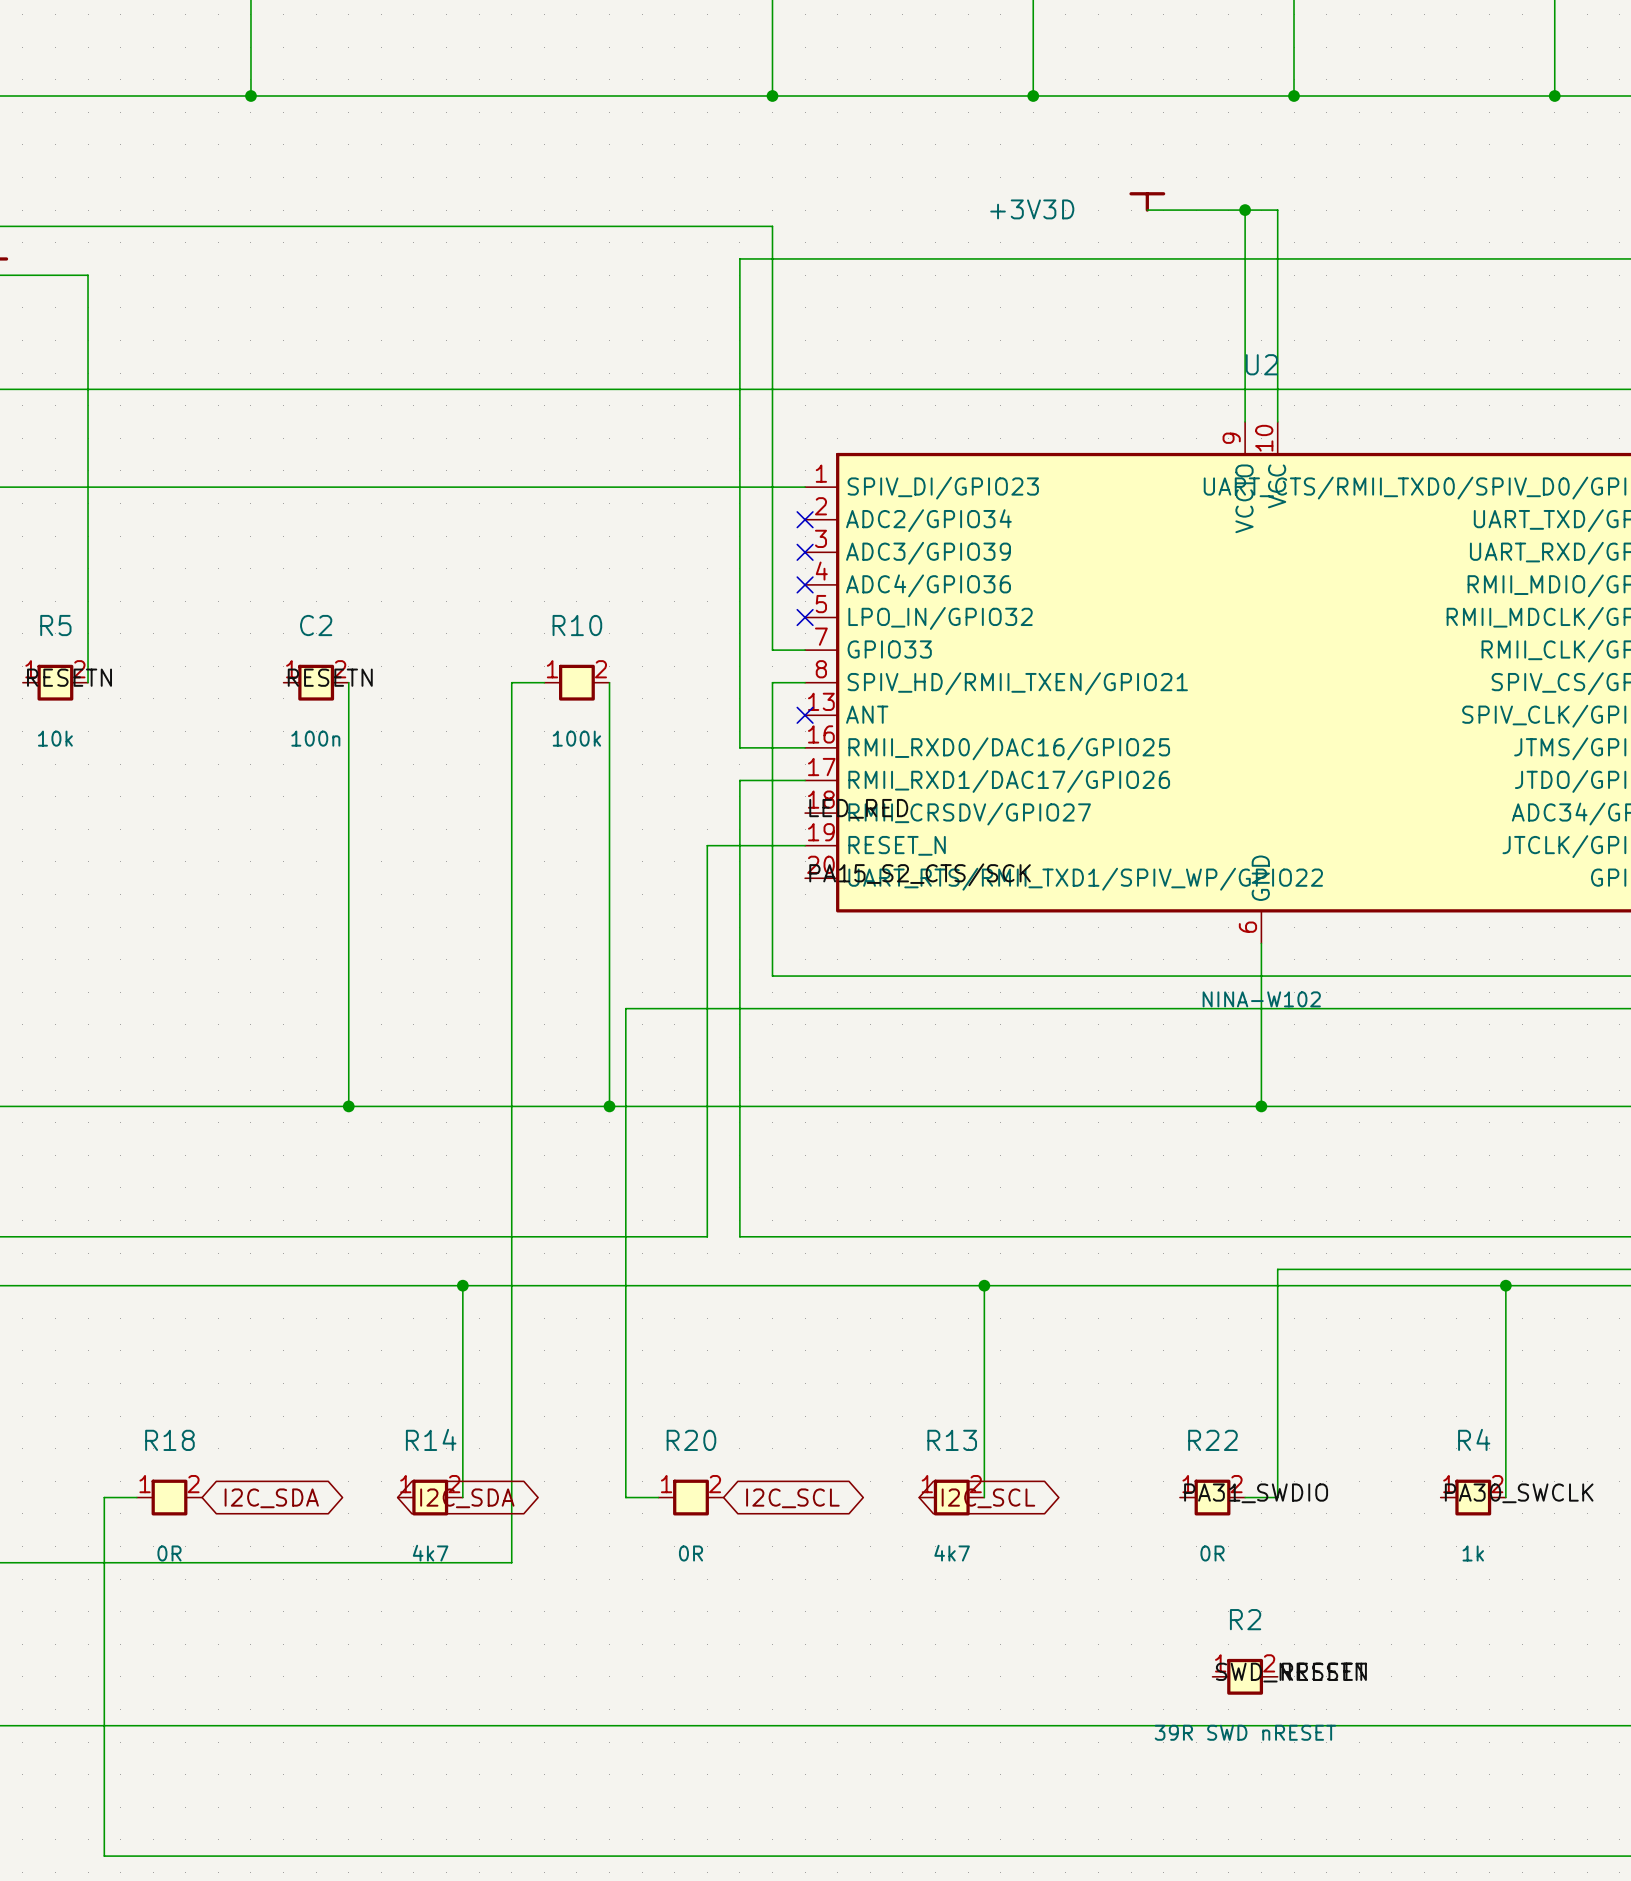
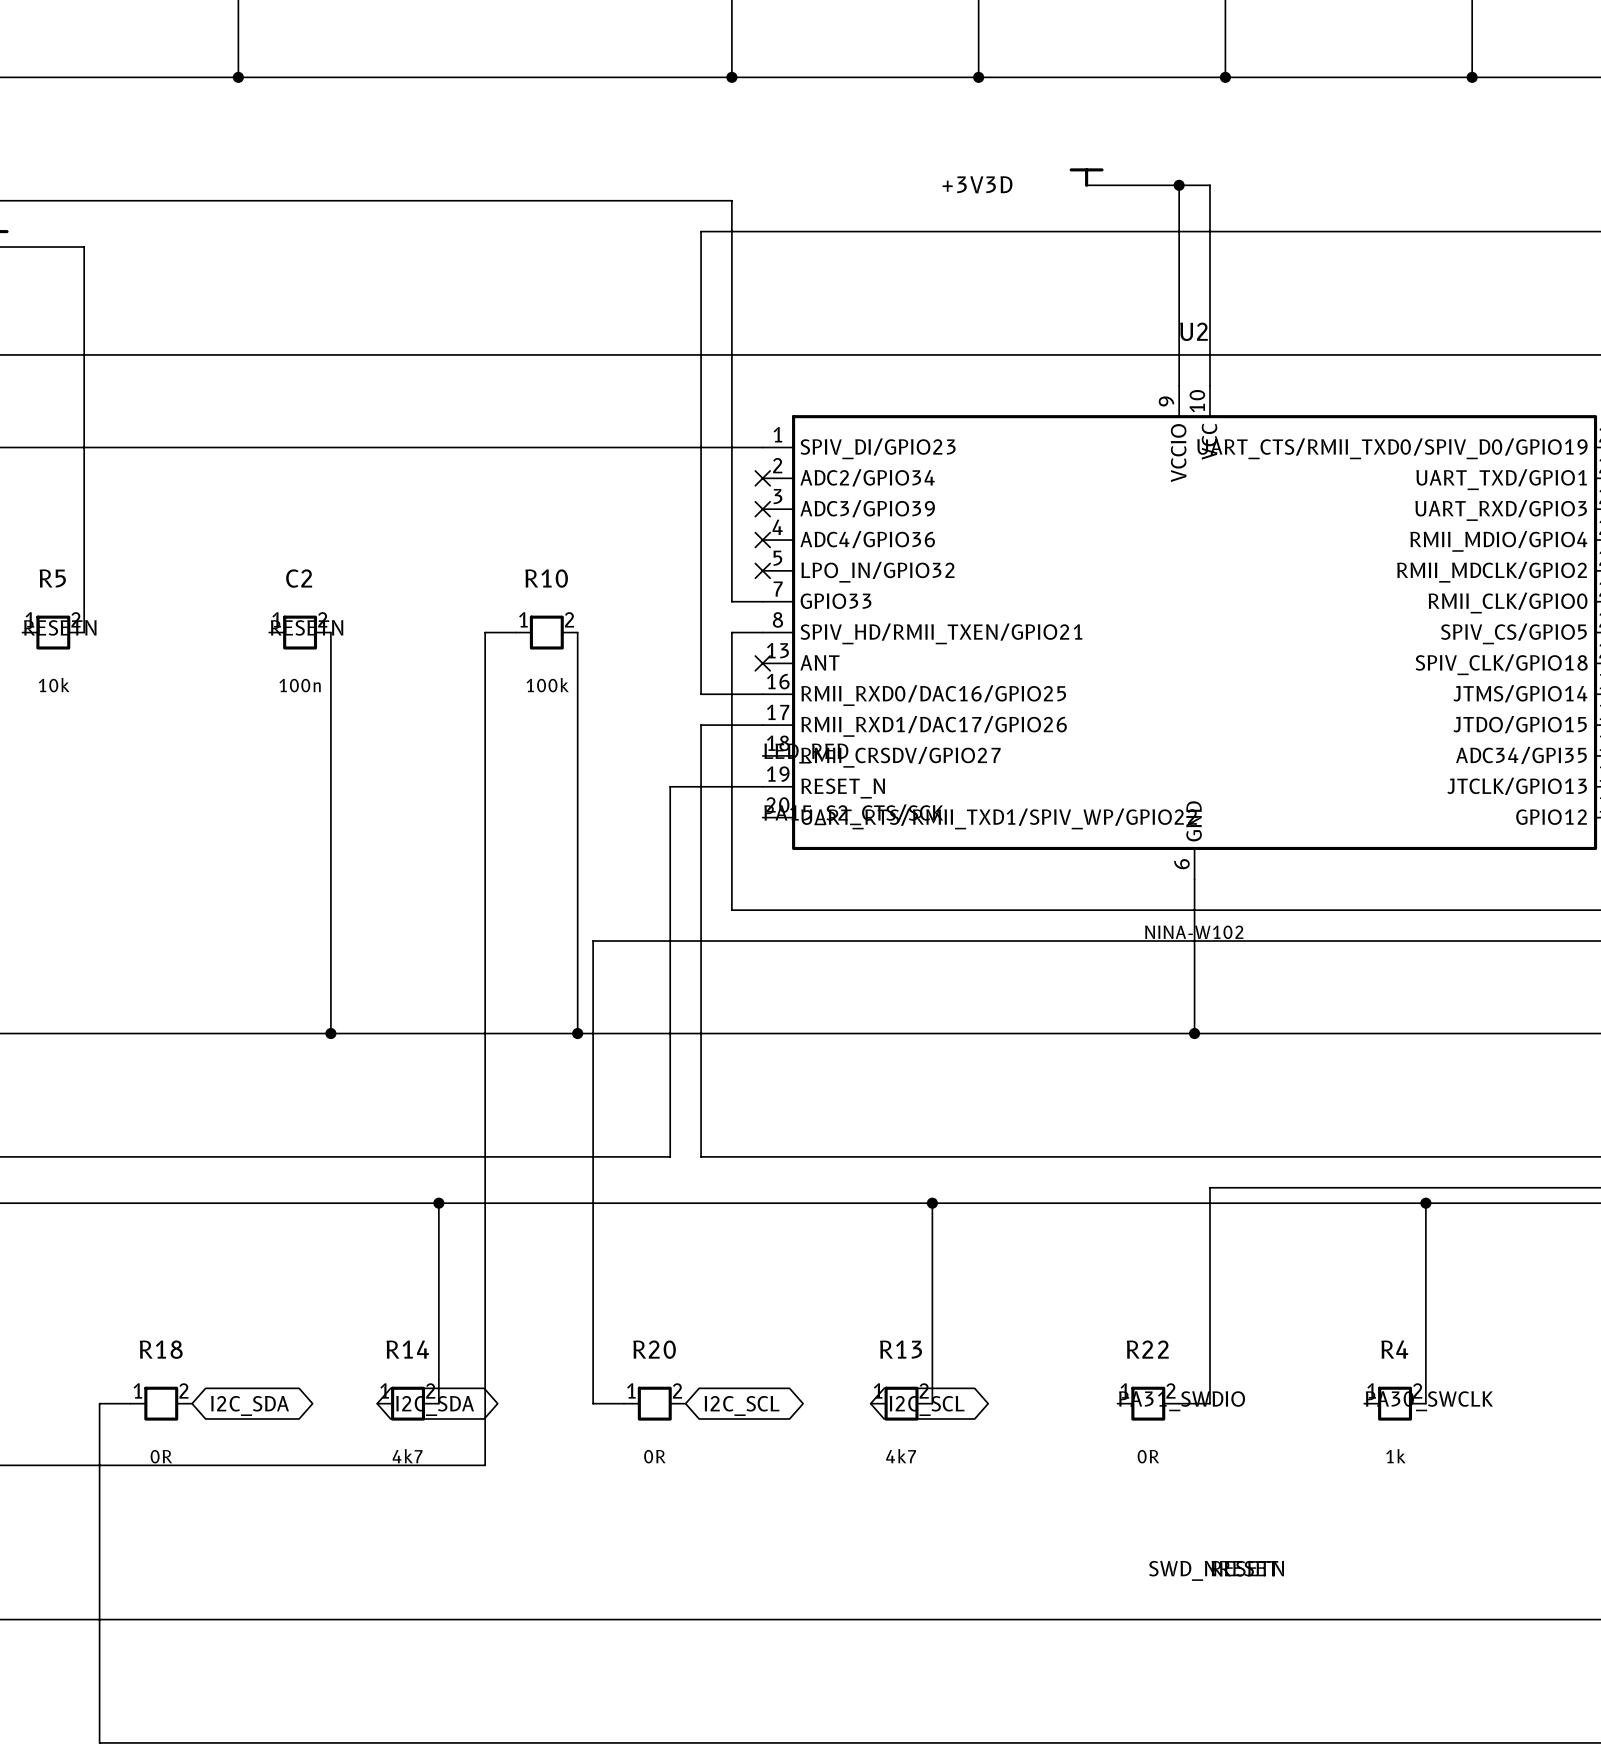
R2: 39R SWD nRESET (1245, 1676) -> none

